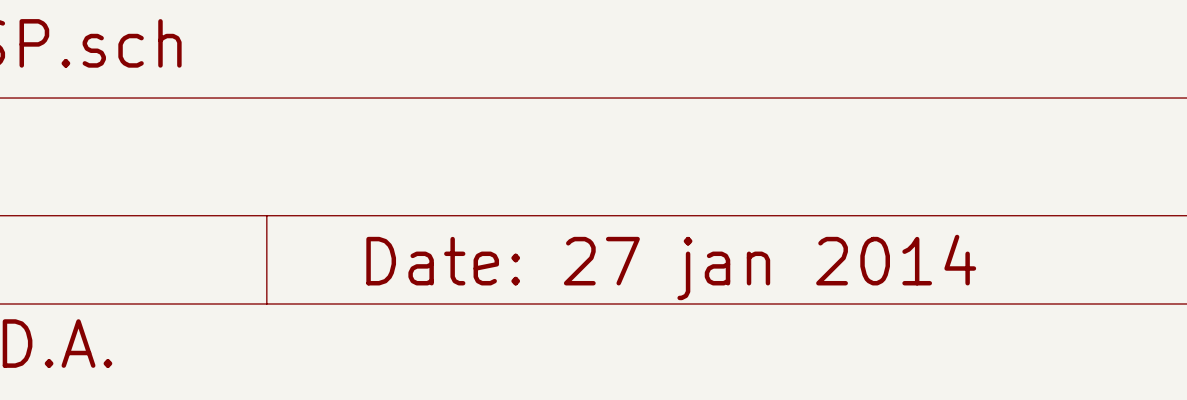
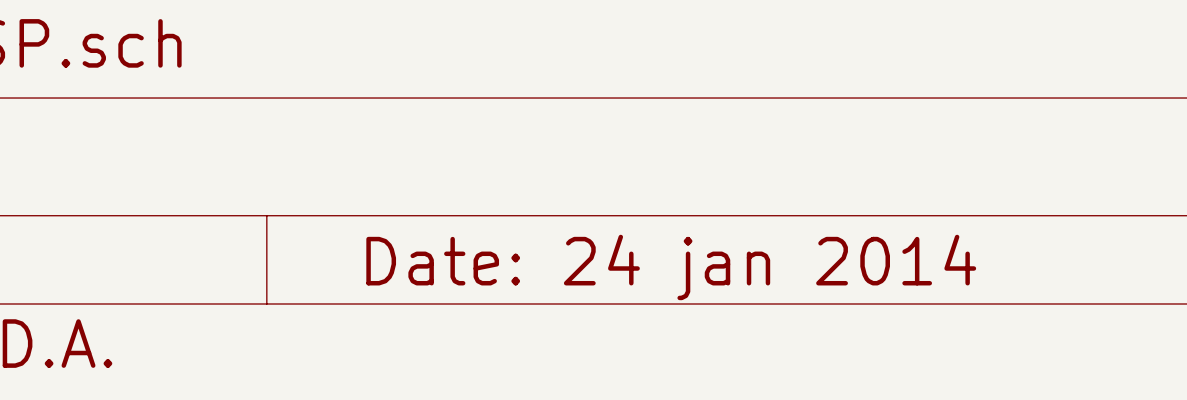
title block: Date: 27 jan 2014 (671, 267) -> Date: 24 jan 2014 (671, 267)

